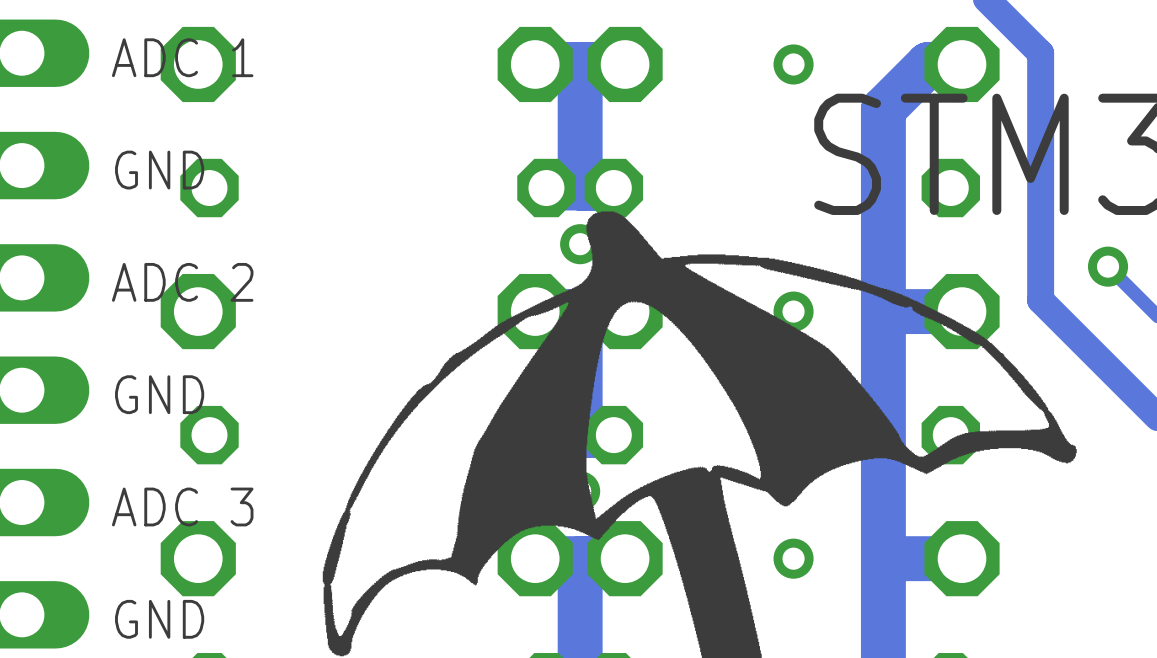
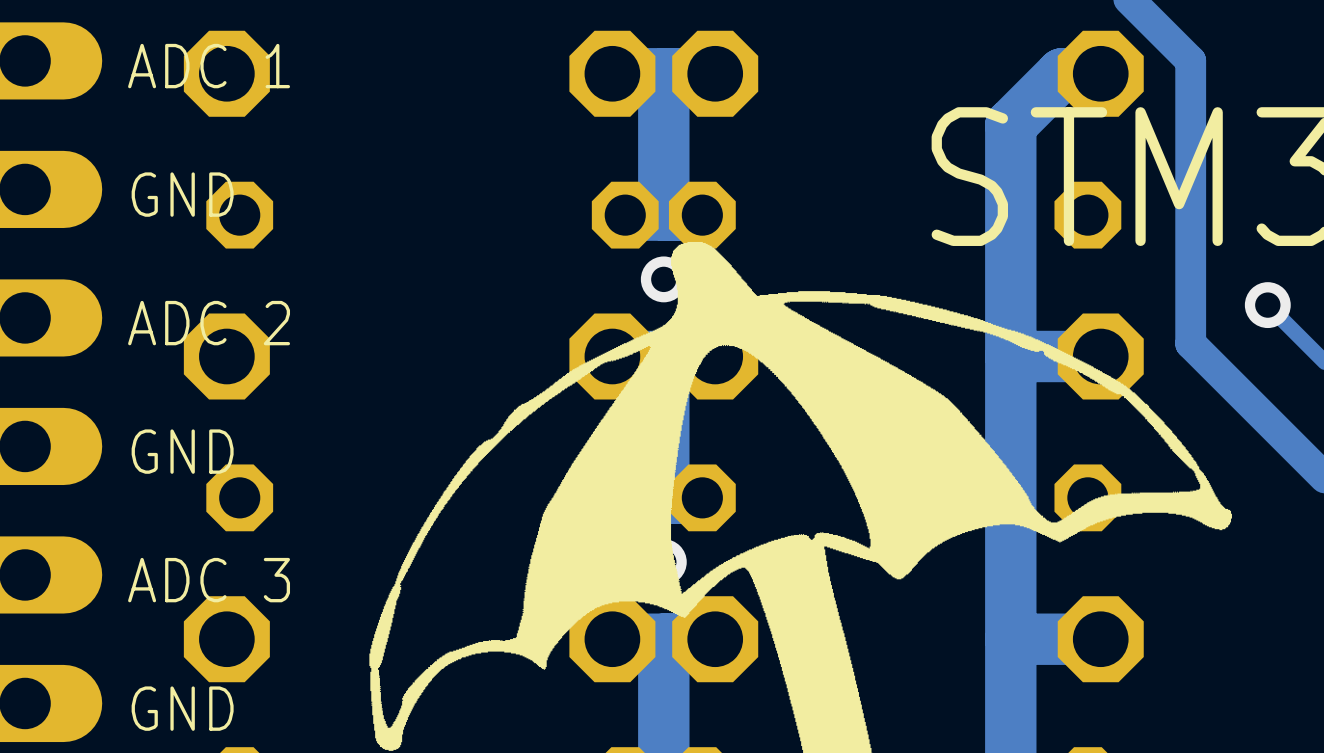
via: (793, 64) -> none
via: (793, 311) -> none
via: (793, 558) -> none

